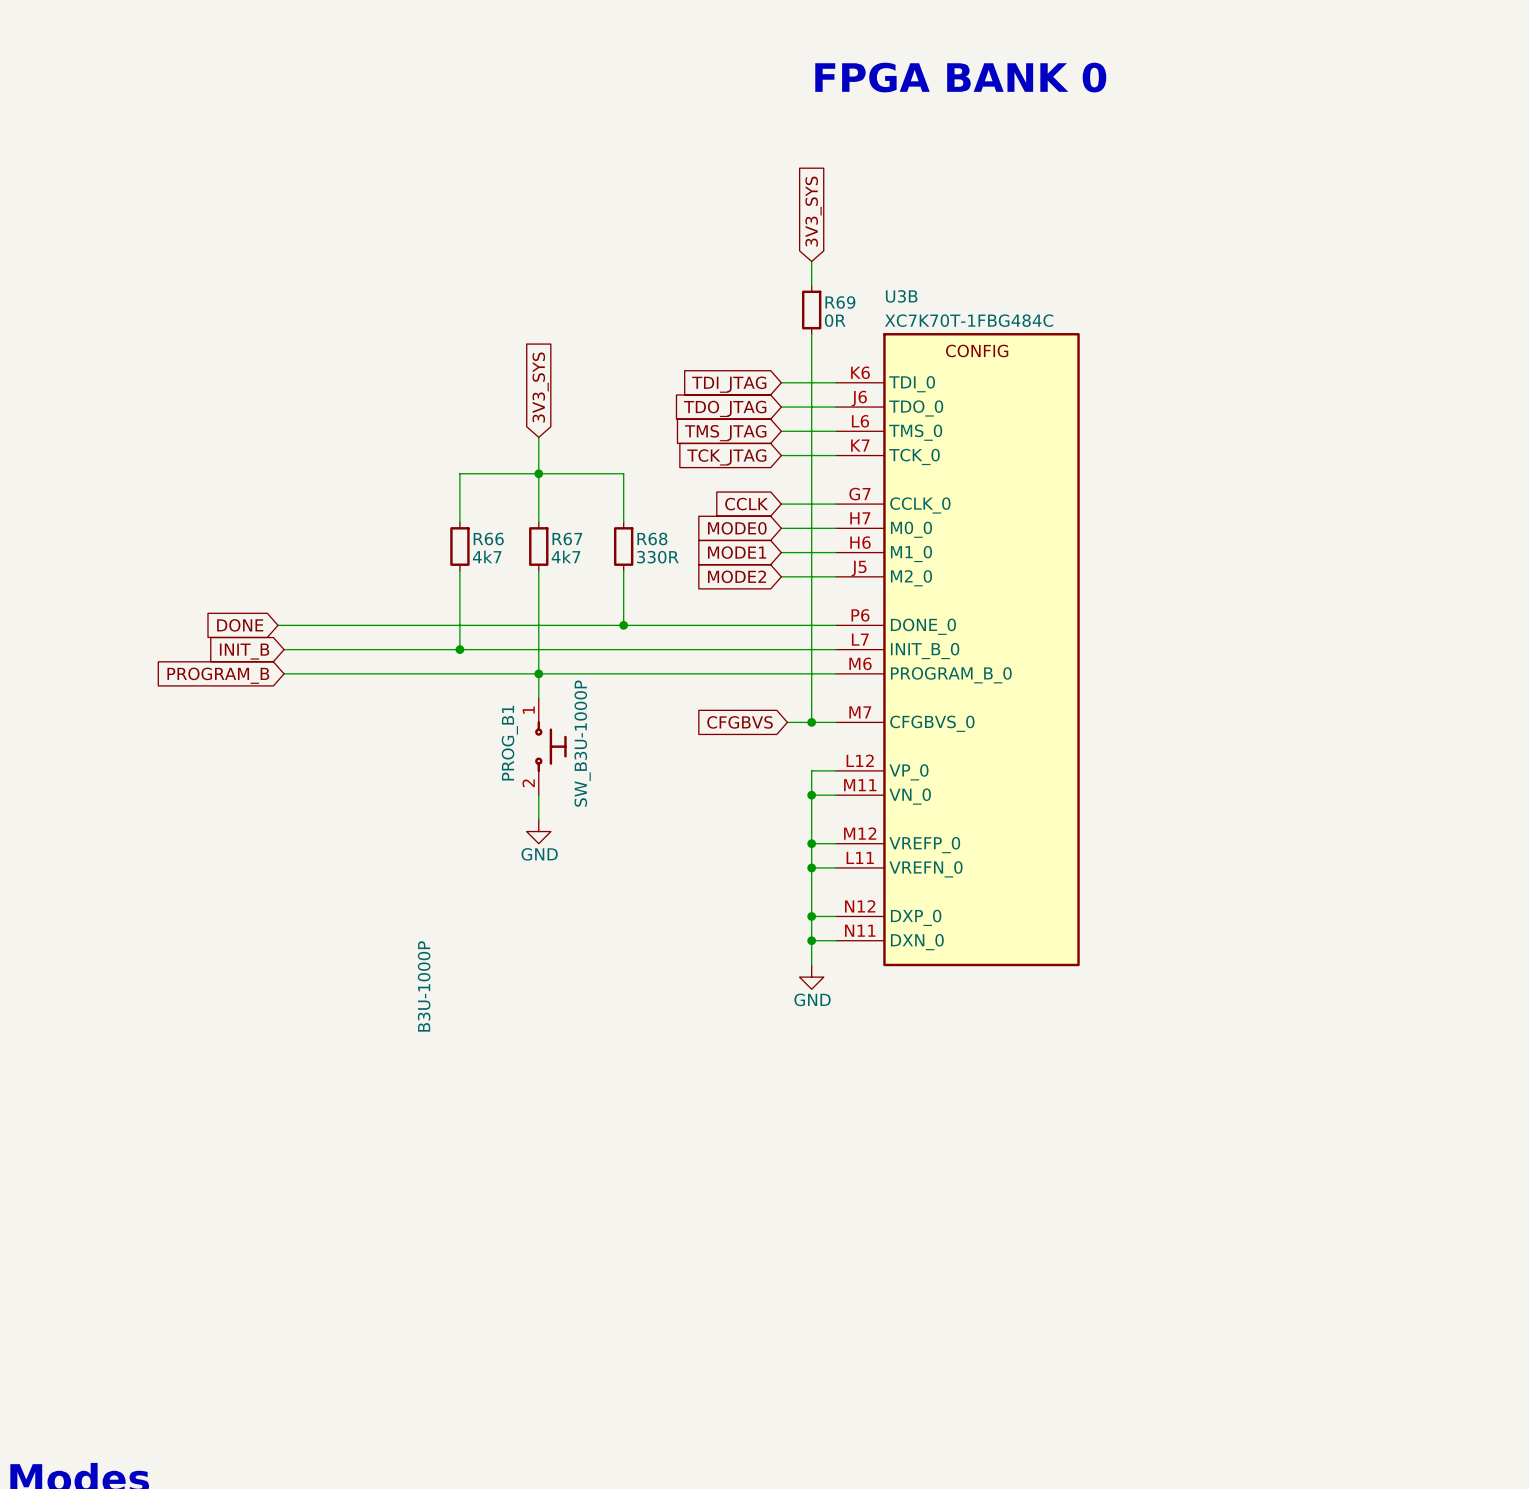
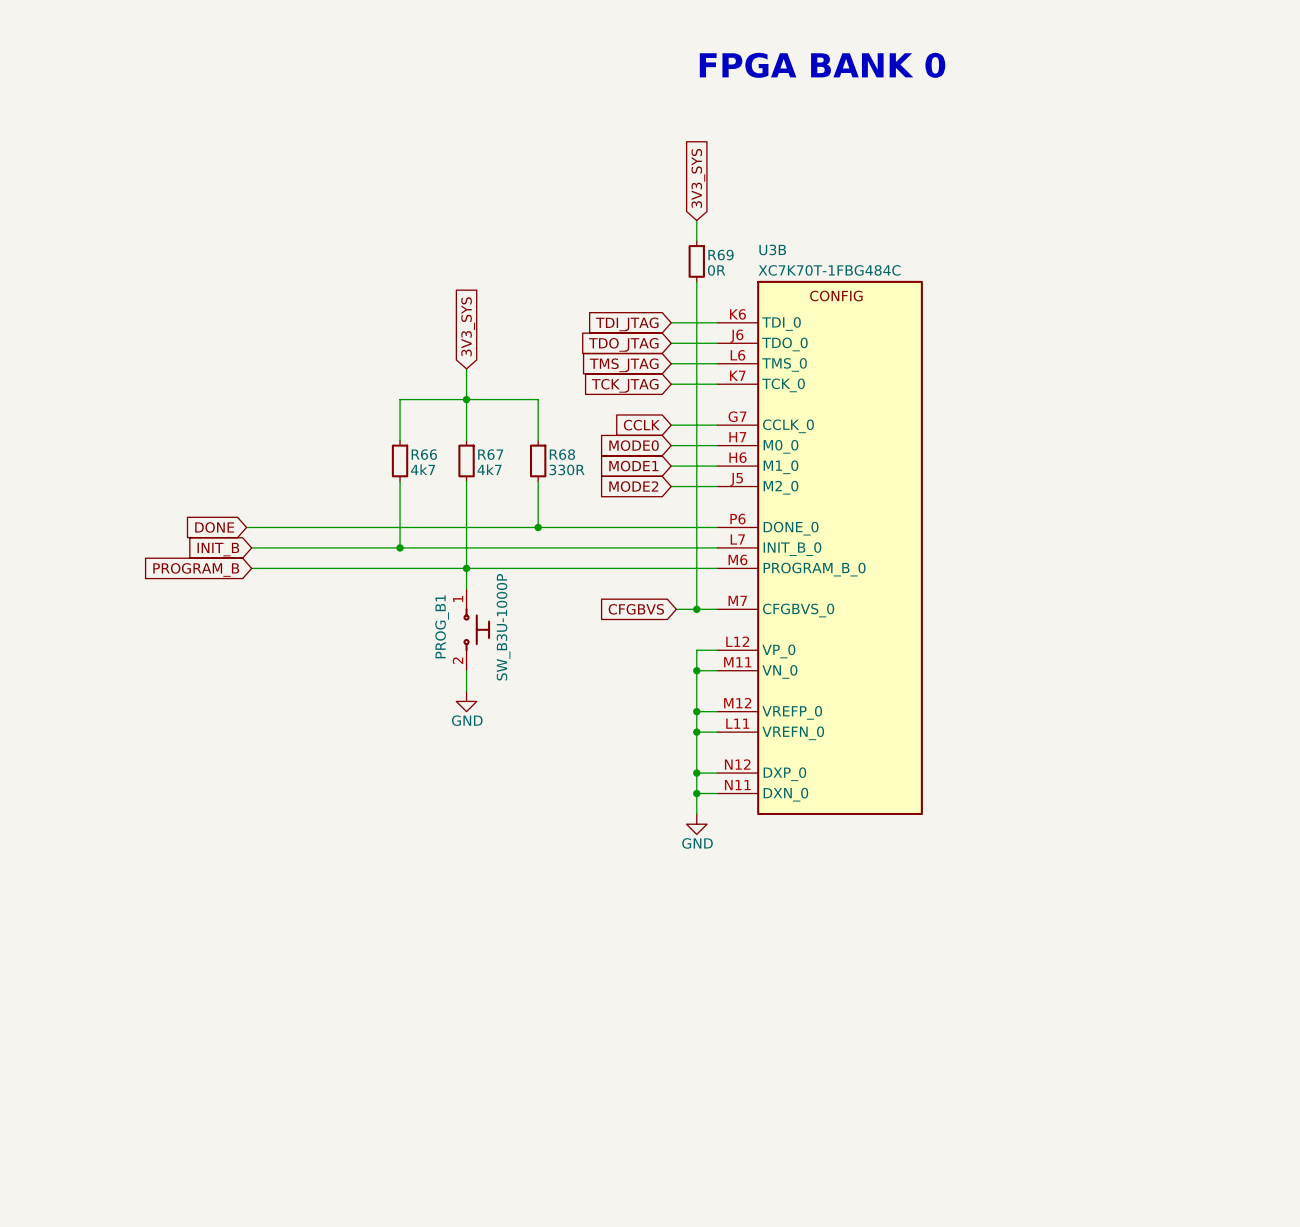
PROG_B1 text: B3U-1000P (424, 986) -> none

